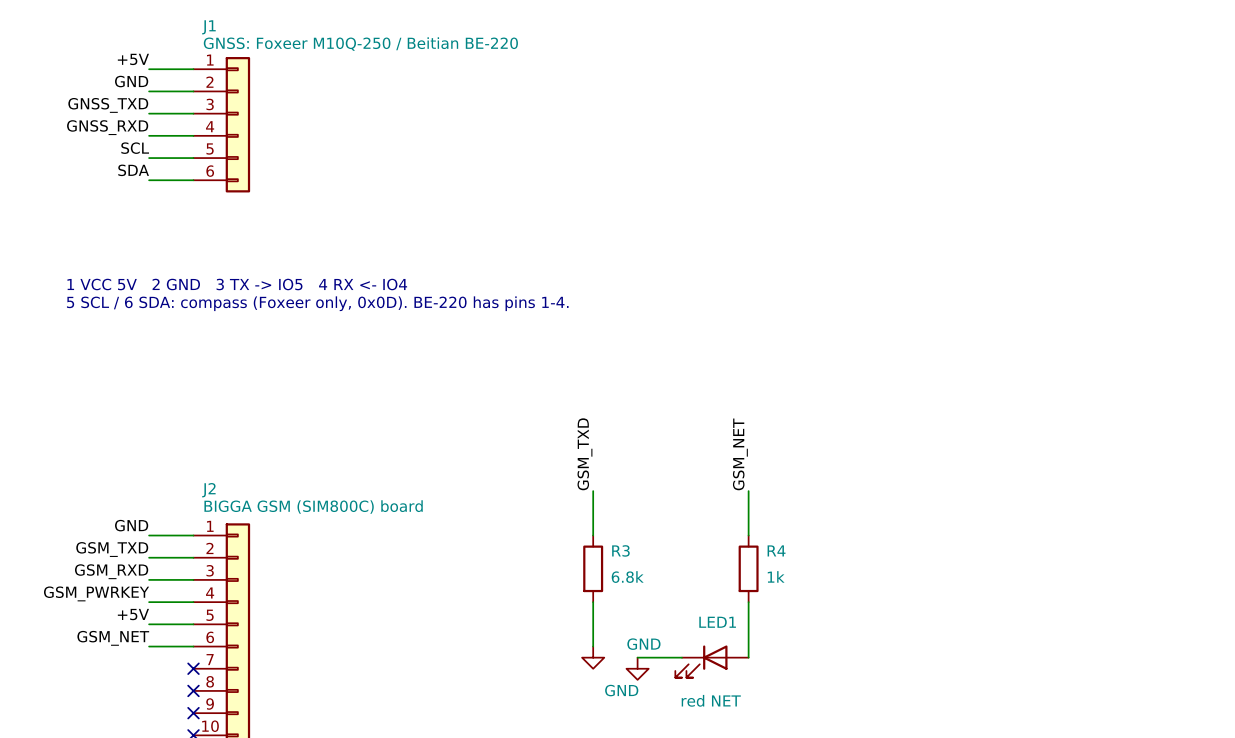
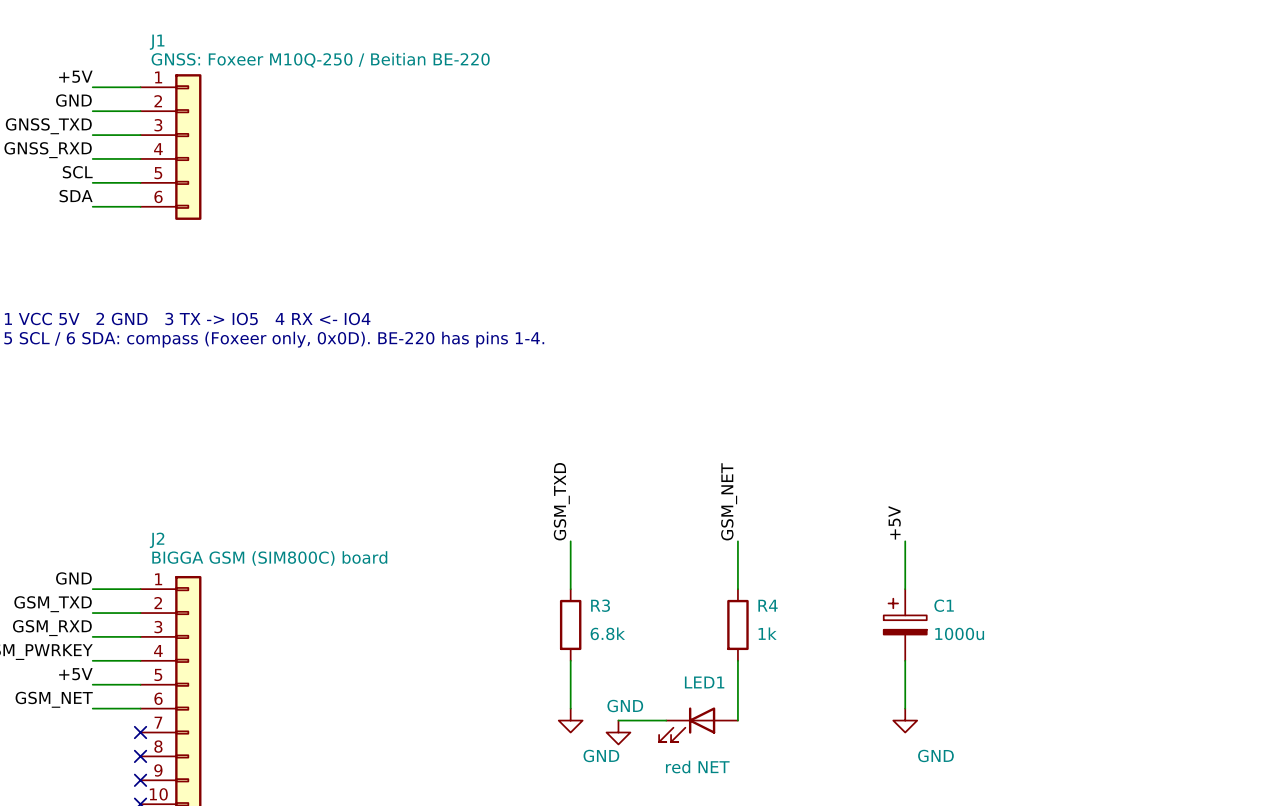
label: none -> +5V (894, 522)
wire: none -> (905, 541) (905, 589)
C1: none -> 1000u (905, 624)
wire: none -> (905, 660) (905, 708)
power symbol: none -> GND (905, 720)

